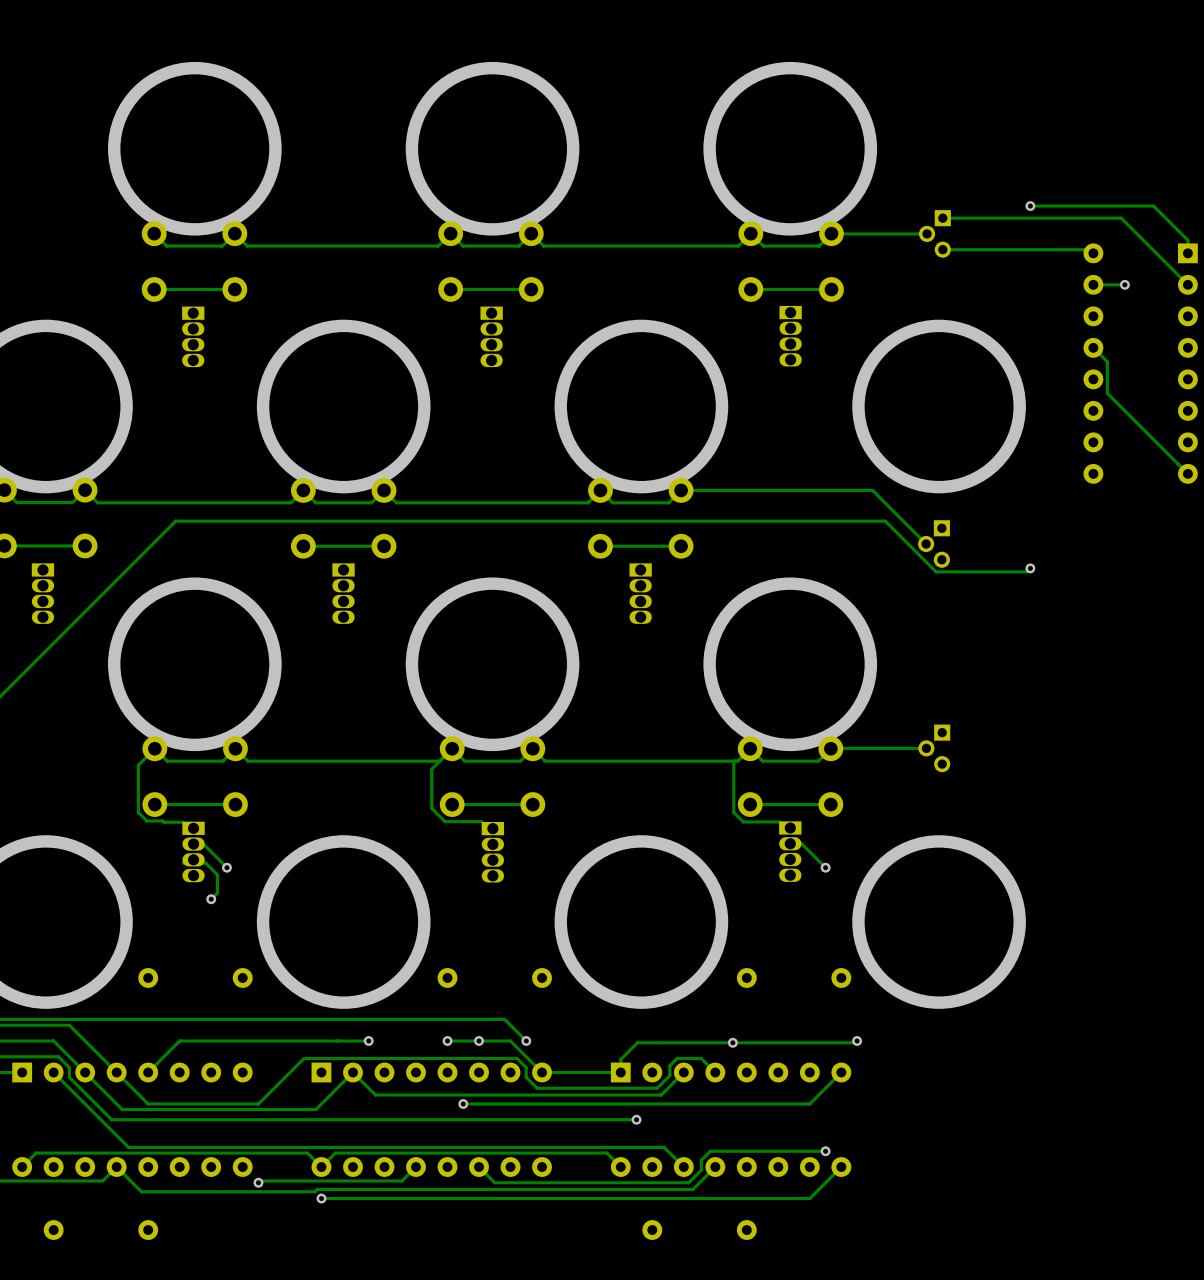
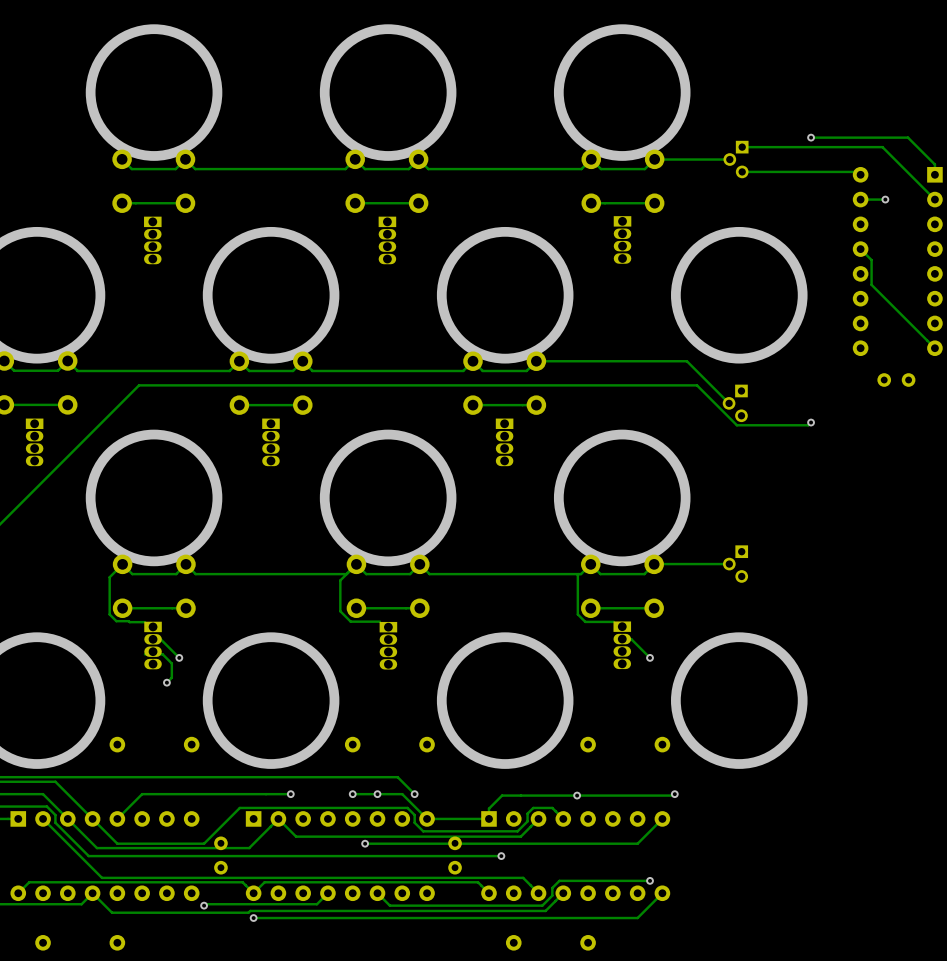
part: none -> (896, 380)
part: none -> (220, 855)
part: none -> (455, 855)

